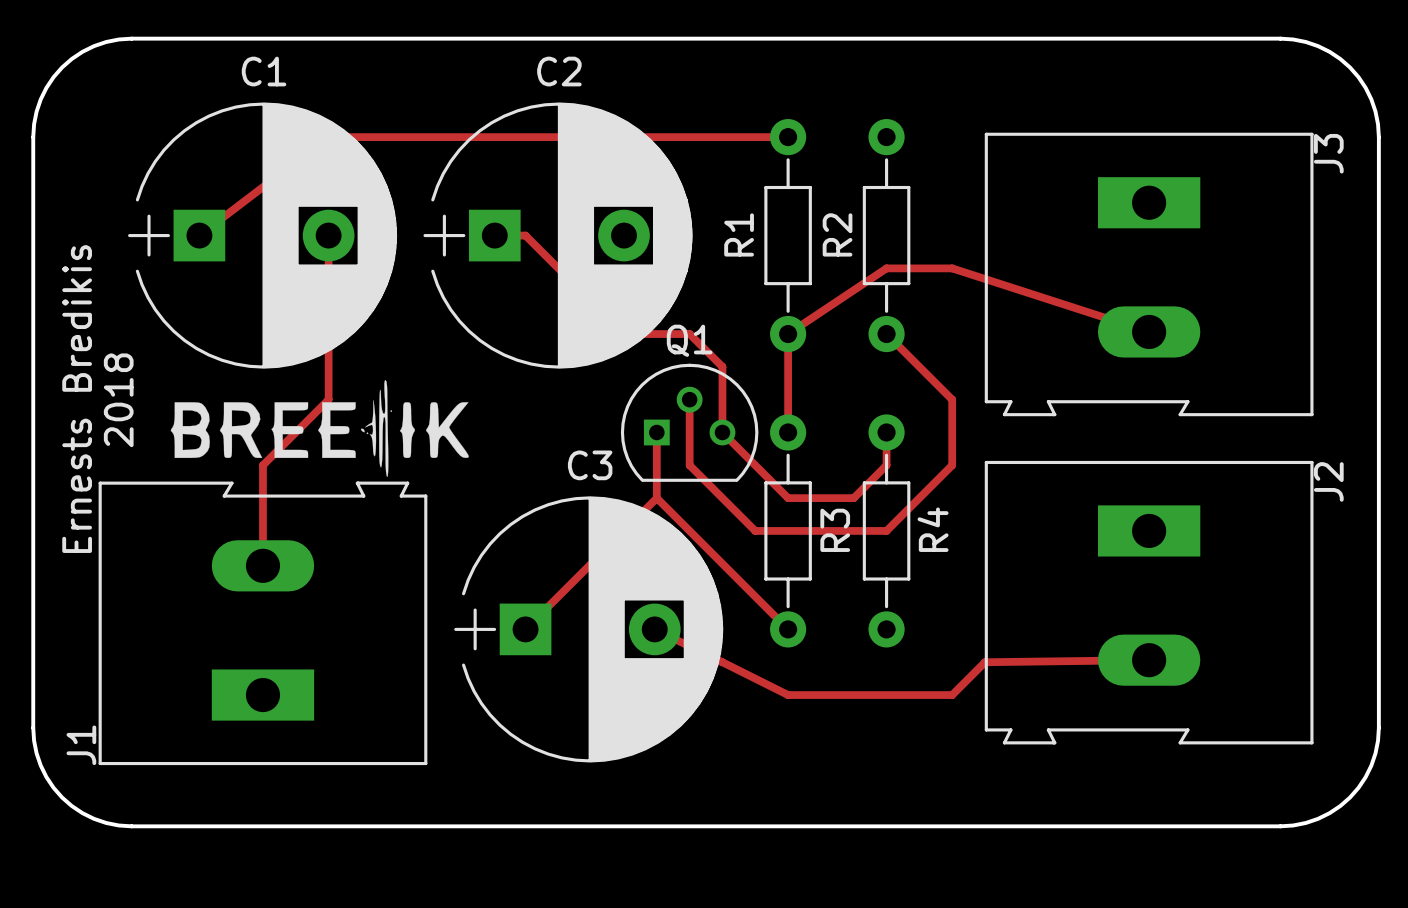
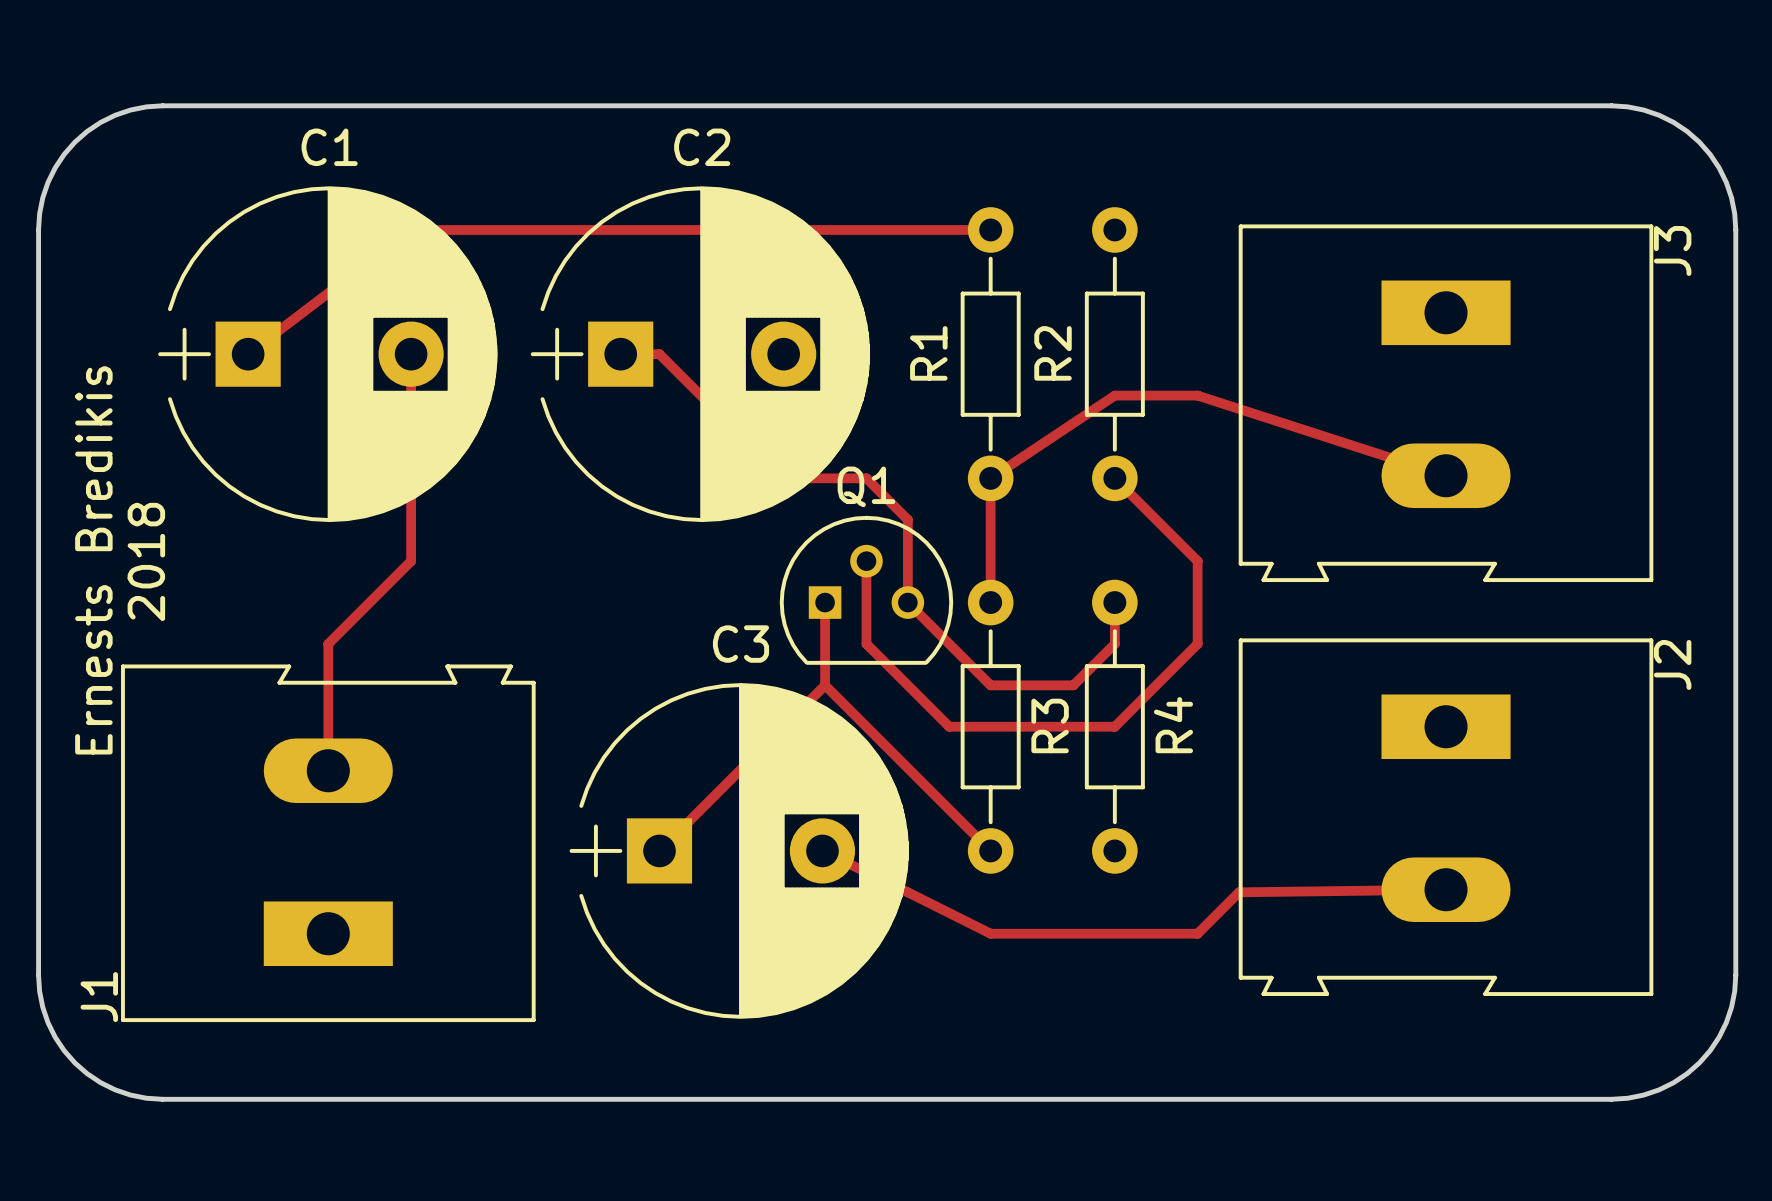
drawing: [170, 380, 469, 478] -> none

